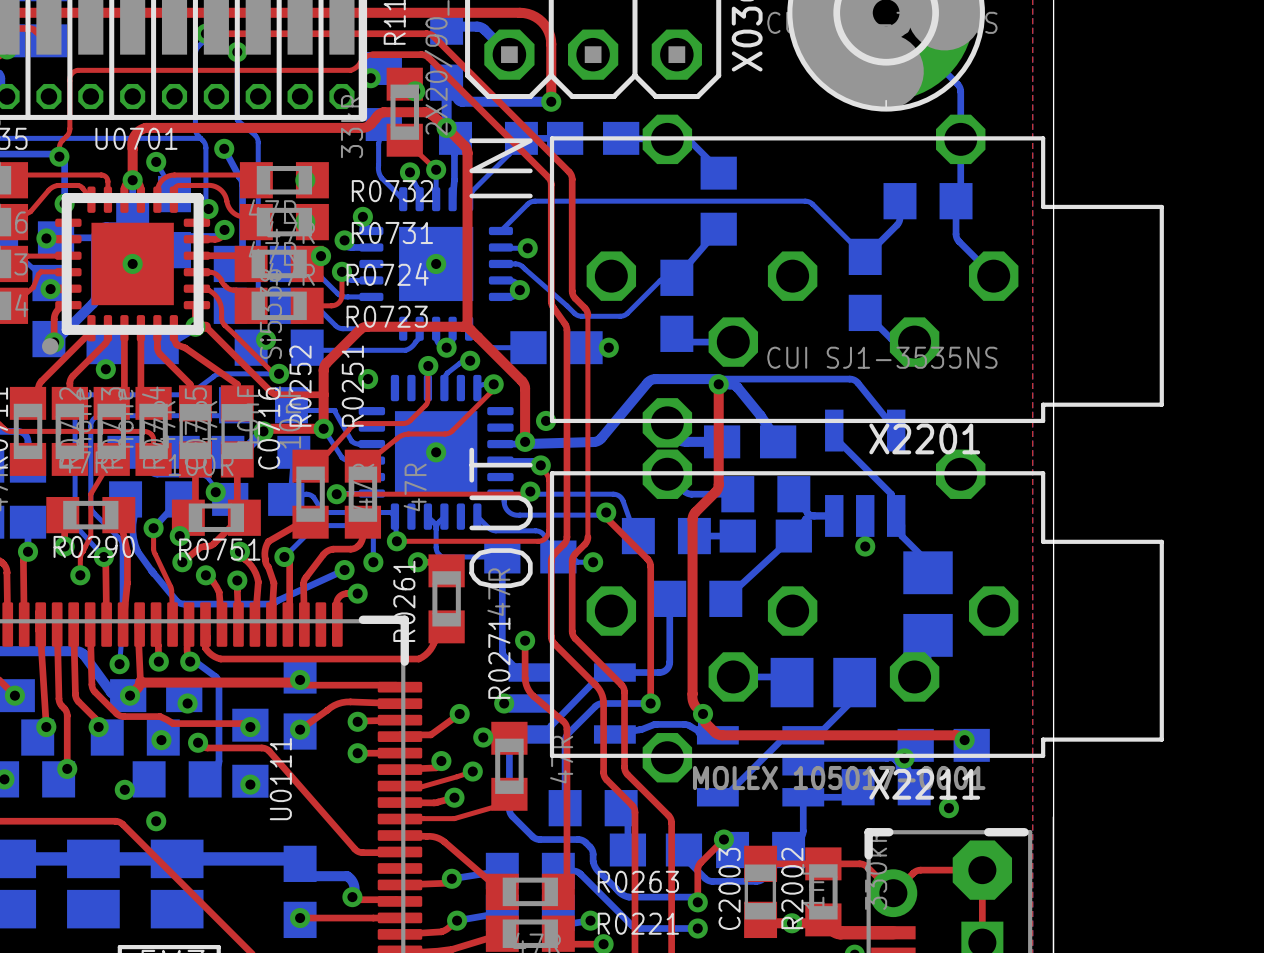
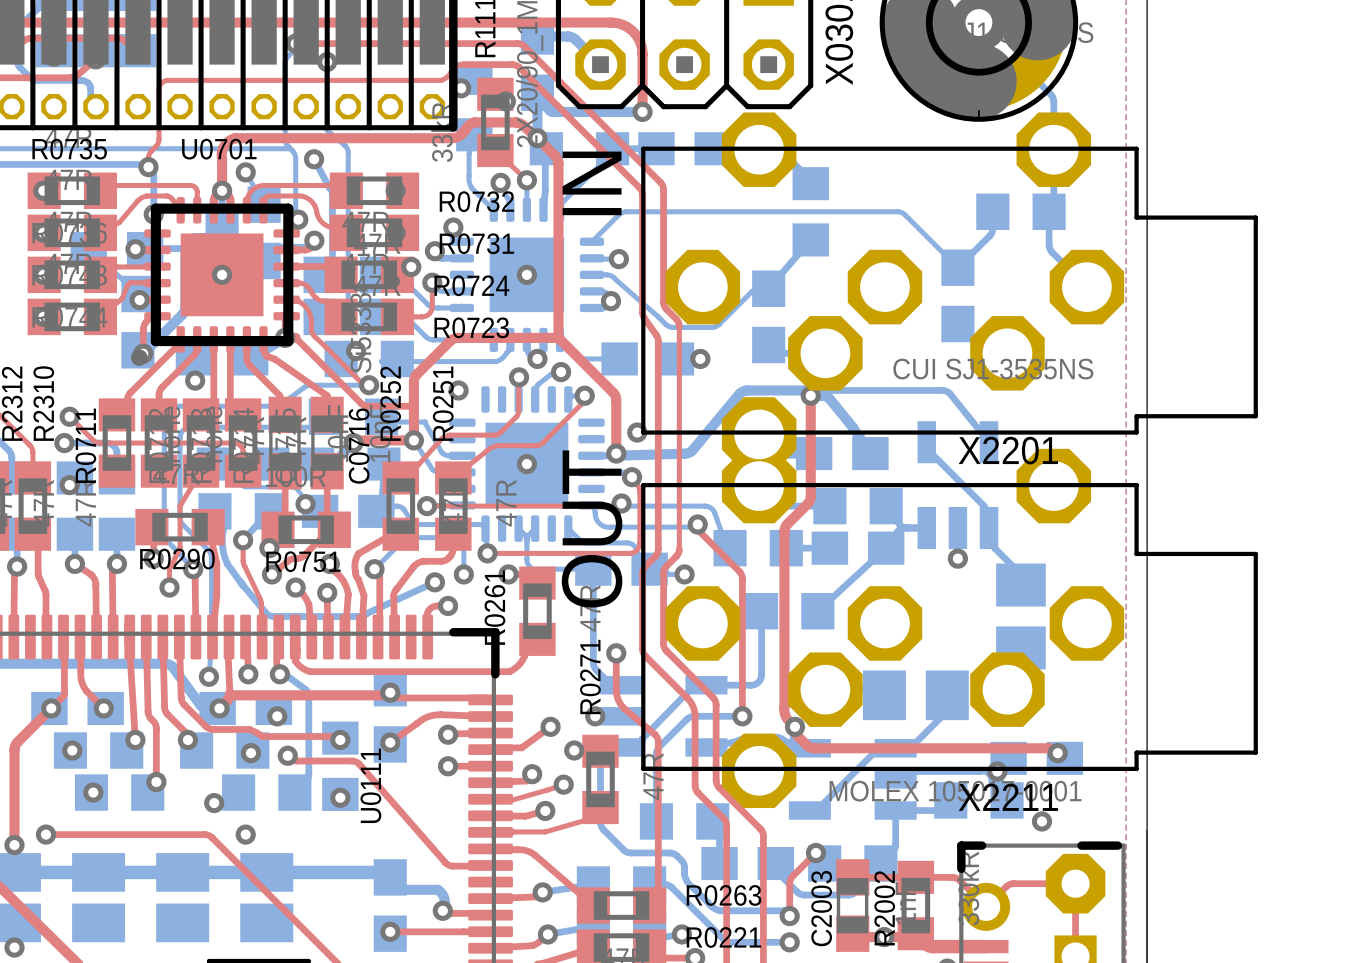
X2201 footprint: [549, 114, 1164, 448] -> [641, 112, 1258, 472]
X2211 footprint: [549, 449, 1164, 783] -> [641, 448, 1258, 809]

